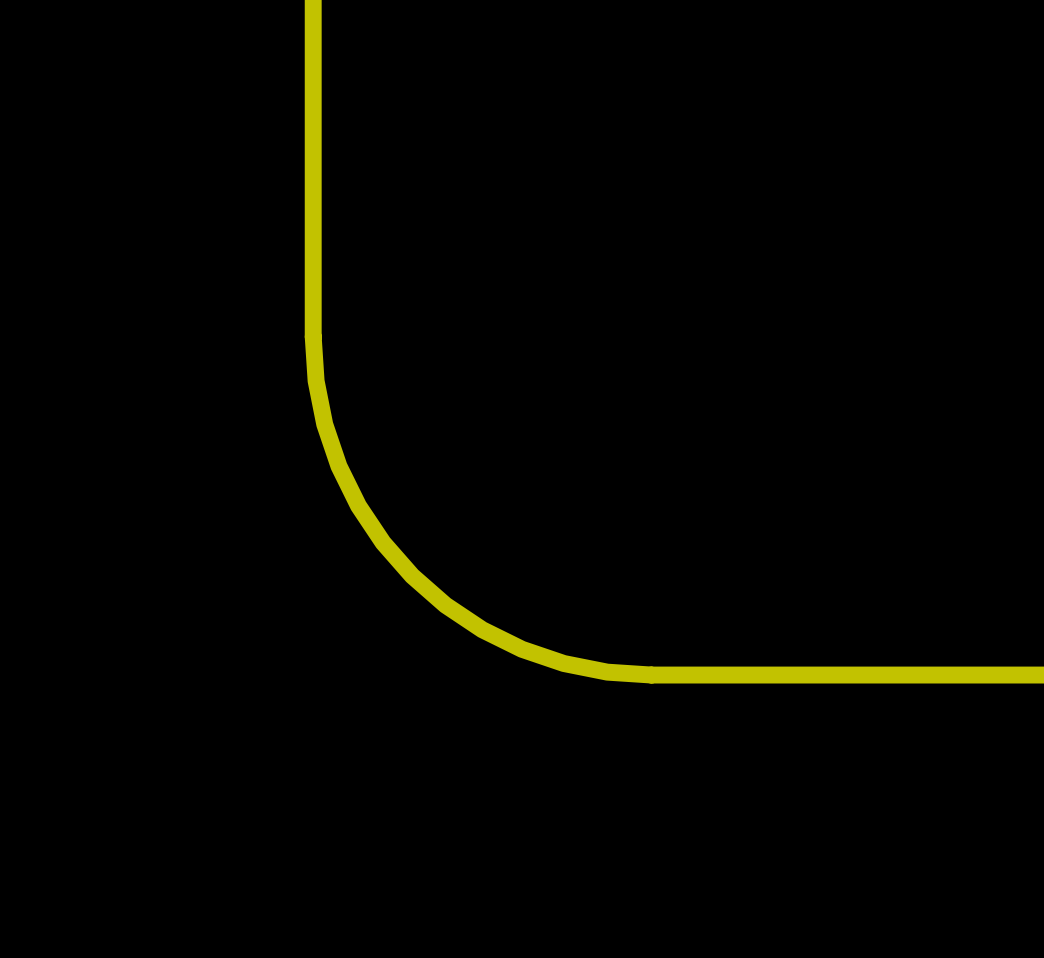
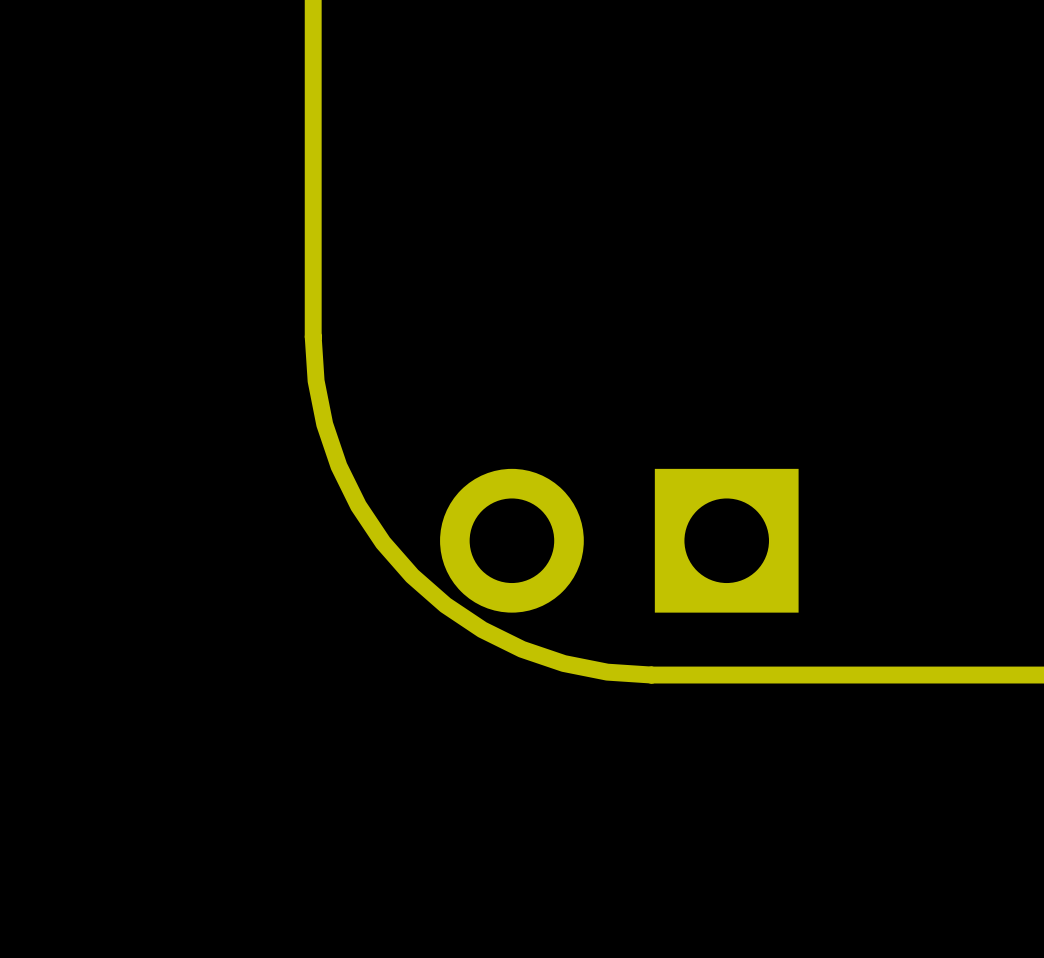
part: none -> (619, 540)

